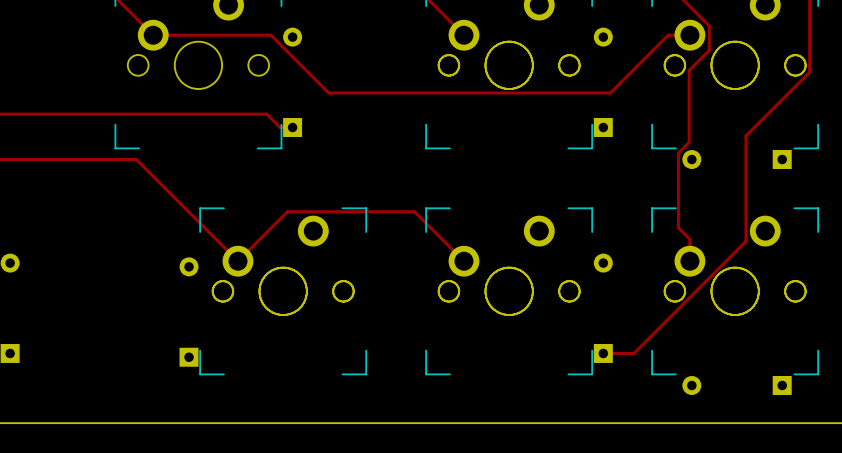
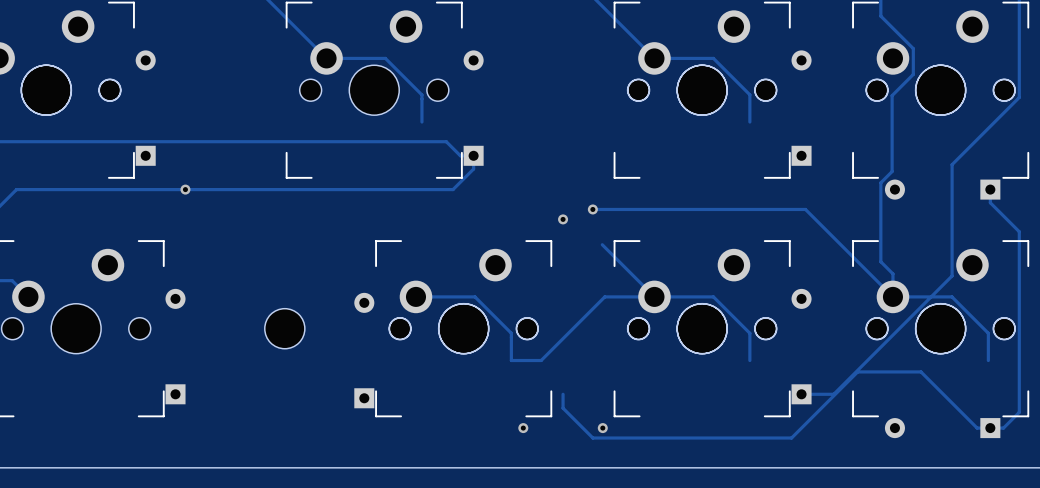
track: (209, 35) (270, 35) (328, 92) (610, 92) (668, 35) (689, 35) -> (385, 58) (421, 94) (421, 122)
track: none -> (654, 58) (713, 58) (749, 94) (749, 122)
via: none -> (185, 189)
track: (136, 159) (237, 261) (287, 211) (414, 211) -> (308, 189) (453, 189) (473, 169) (473, 155)
track: none -> (990, 189) (990, 202) (1019, 231) (1019, 412) (1003, 428) (977, 428) (921, 371) (857, 371) (791, 438) (592, 438) (563, 408) (563, 394)
track: none -> (592, 209) (805, 209) (892, 296) (951, 296) (988, 333) (988, 360)
via: none -> (592, 209)
via: none -> (563, 219)
track: none -> (415, 296) (475, 296) (511, 333) (511, 360) (541, 360) (604, 296) (713, 296) (749, 333) (749, 360)
part: none -> (284, 328)
via: none -> (523, 428)
via: none -> (602, 428)

